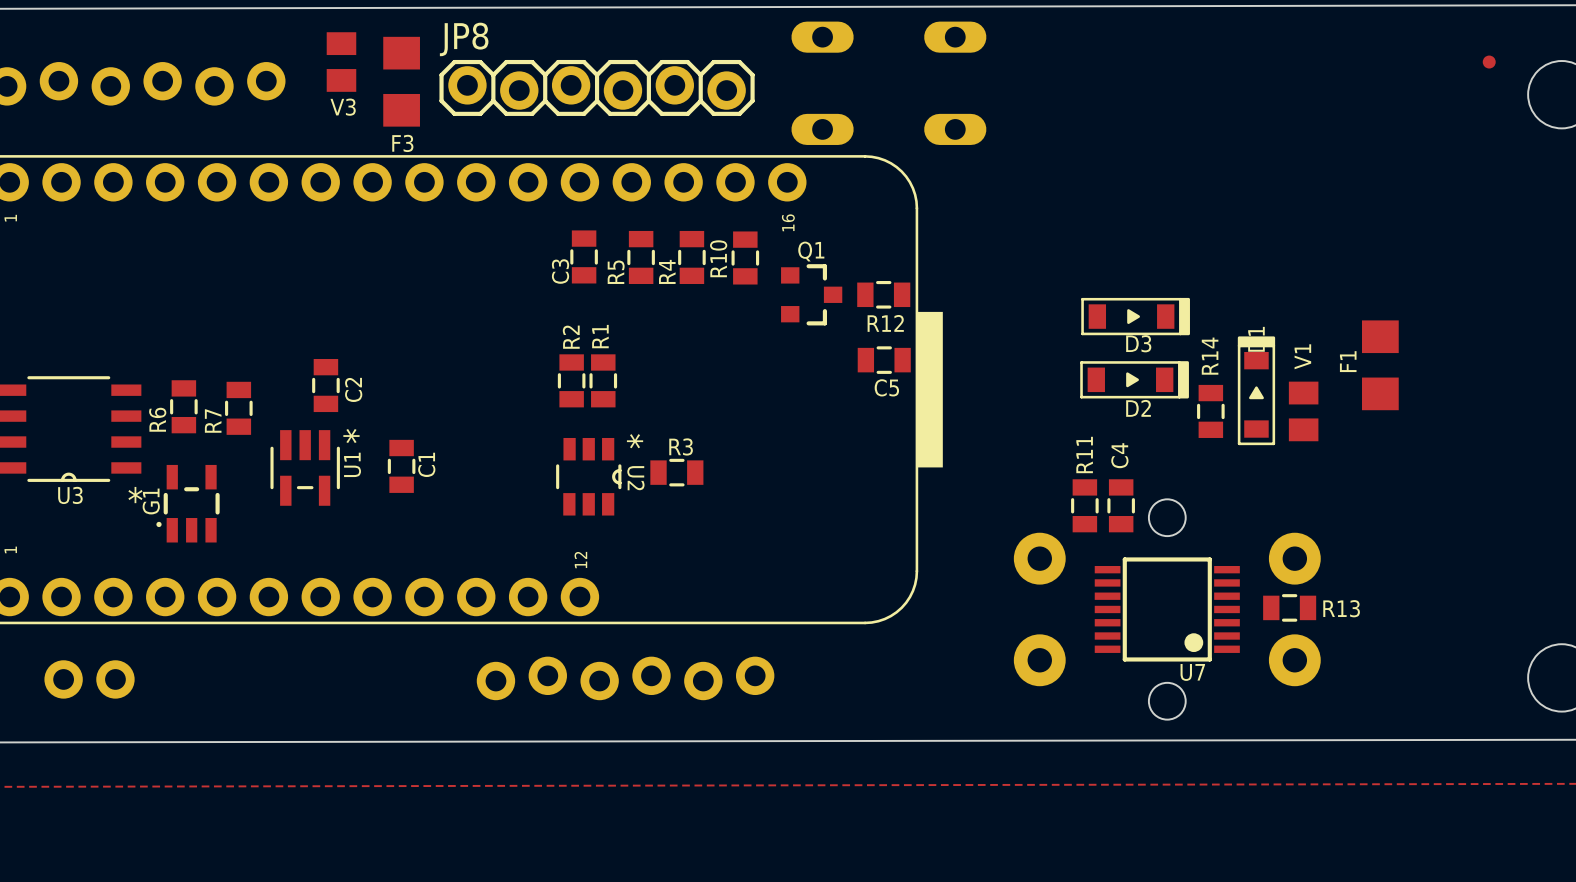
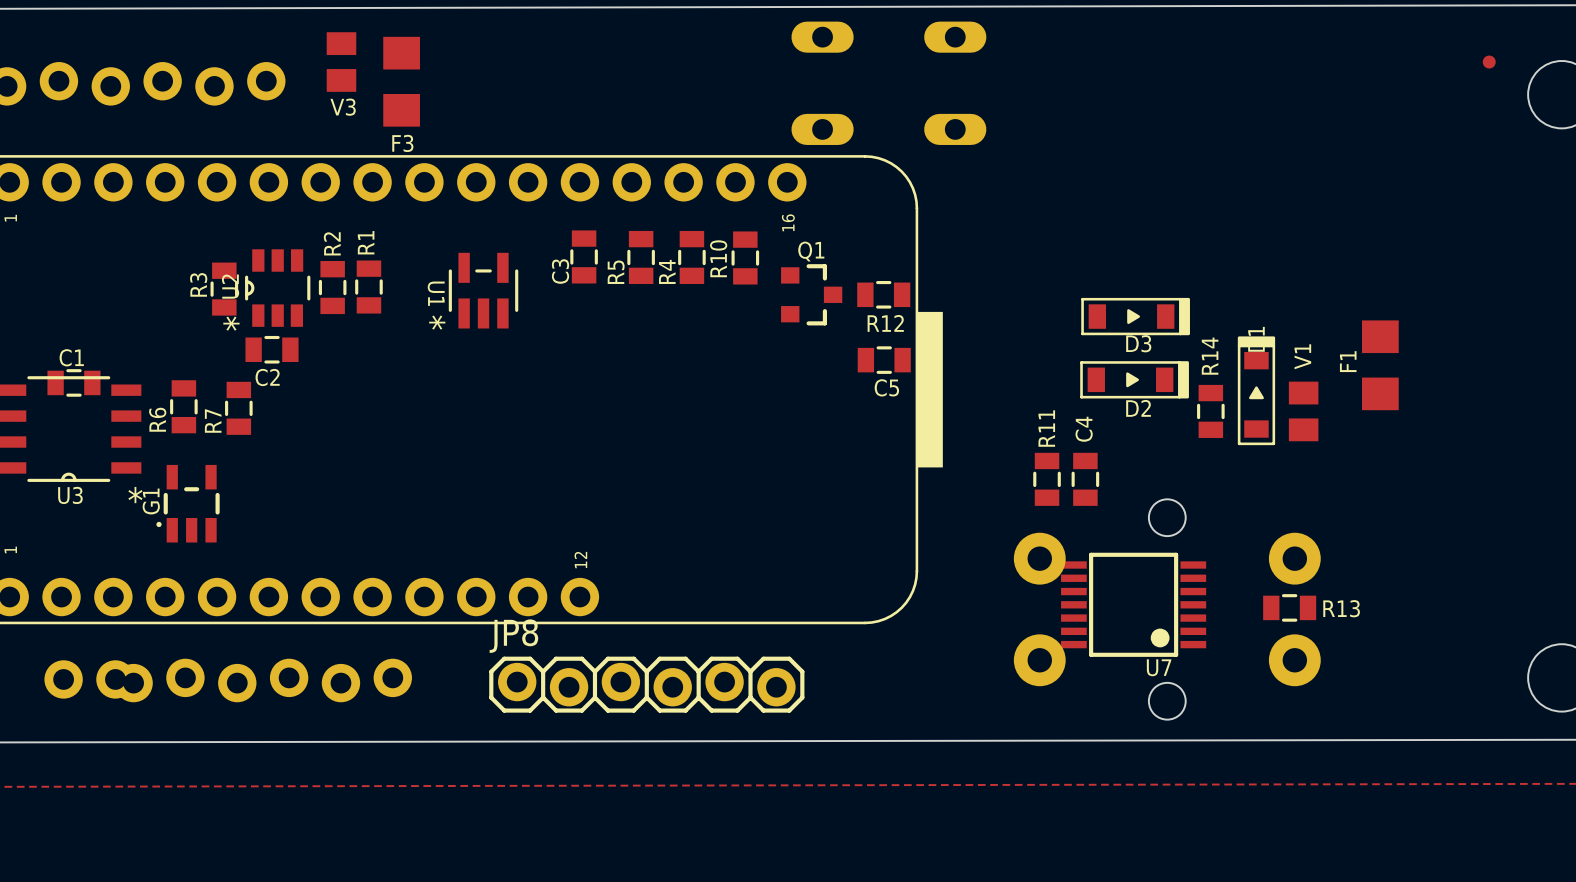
JP8 position: (597, 87) -> (646, 684)
R2 position: (571, 380) -> (332, 287)
R1 position: (603, 380) -> (368, 287)
C2 rotation: 0° (325, 385) -> 90° clockwise (272, 349)
C2 position: (325, 385) -> (272, 349)
C1 rotation: 0° (401, 466) -> 90° clockwise (73, 382)
C1 position: (401, 466) -> (73, 382)
U1 rotation: 0° (305, 467) -> 180° (483, 290)
U1 position: (305, 467) -> (483, 290)
R3 rotation: 0° (676, 472) -> 90° clockwise (224, 289)
R3 position: (676, 472) -> (224, 289)
U2 rotation: 0° (588, 476) -> 180° (277, 288)
U2 position: (588, 476) -> (277, 288)
R11 position: (1084, 505) -> (1047, 479)
C4 position: (1121, 505) -> (1085, 479)
U7 position: (1167, 609) -> (1133, 604)
part position: (625, 678) -> (263, 680)

